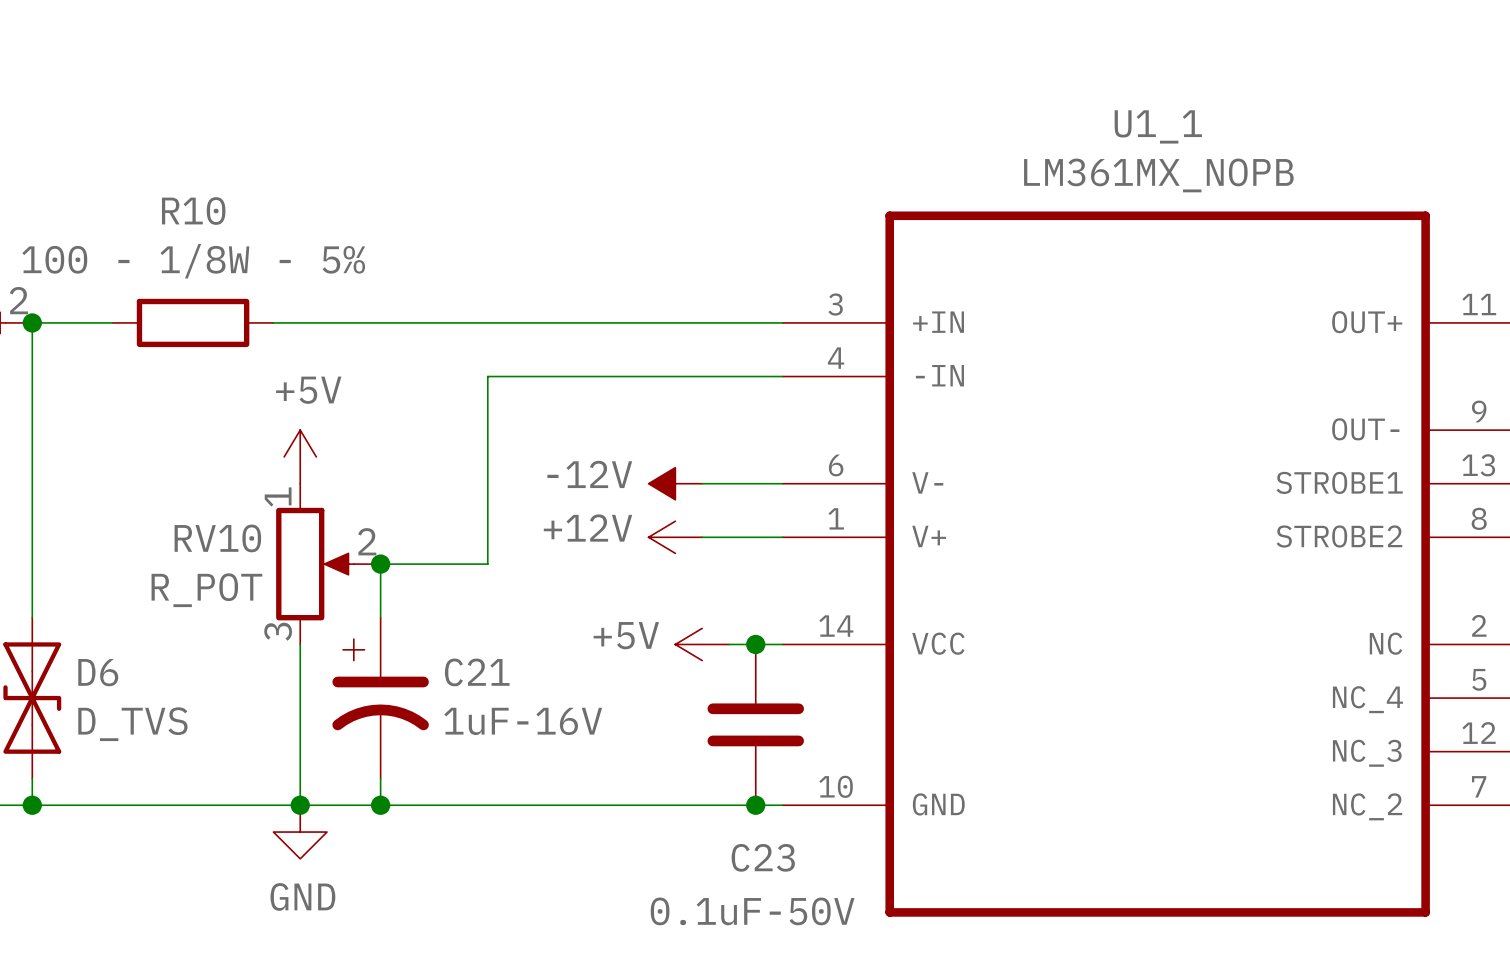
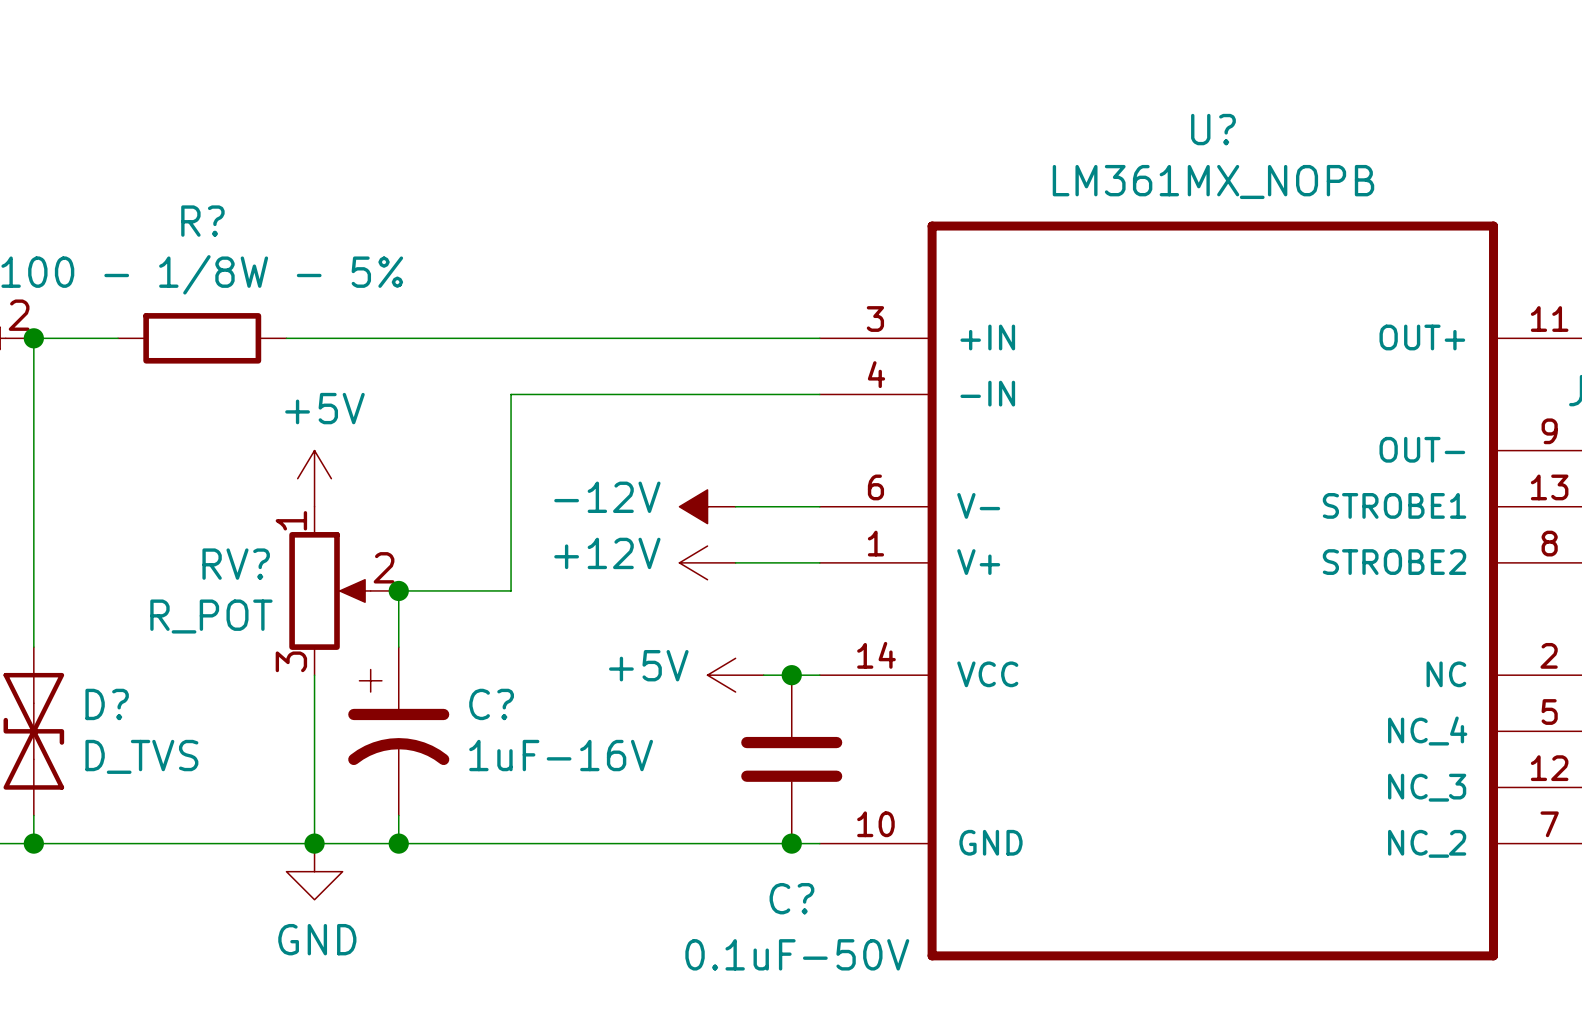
U1_1 name: U1_1 (1158, 126) -> U? (1213, 129)
R10 name: R10 (193, 211) -> R? (202, 221)
RV10 name: RV10 (217, 538) -> RV? (236, 564)
D6 name: D6 (98, 672) -> D? (107, 704)
C21 name: C21 (477, 672) -> C? (491, 704)
C23 name: C23 (763, 857) -> C? (791, 898)

